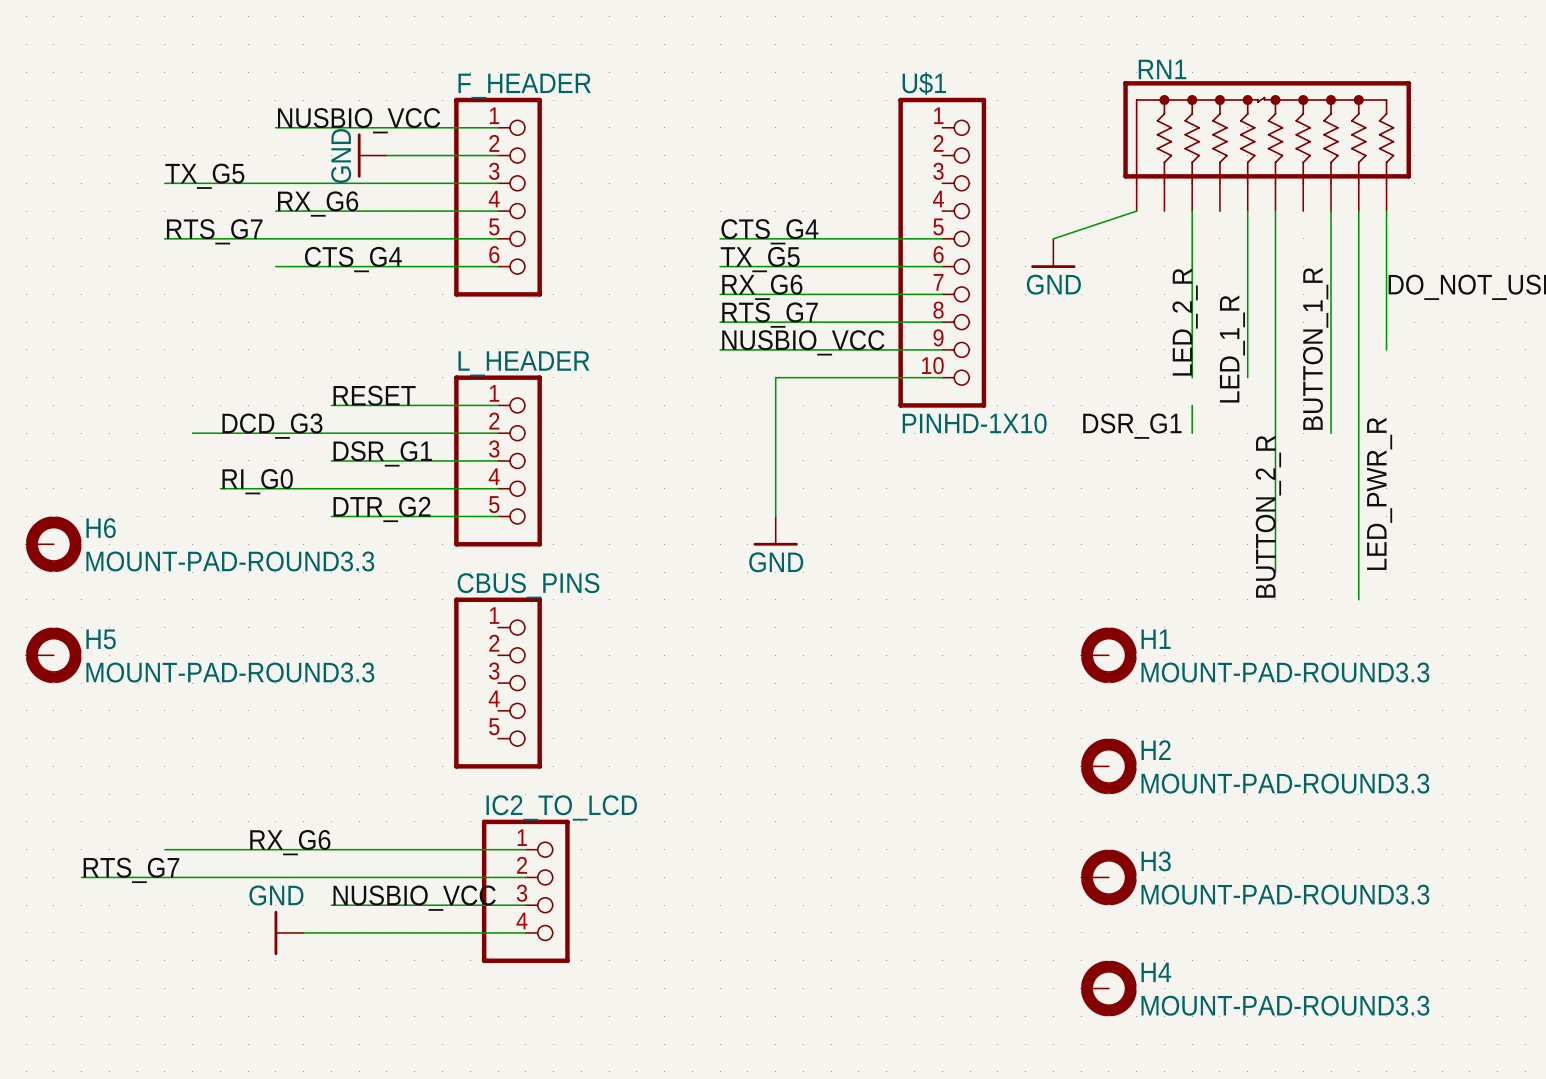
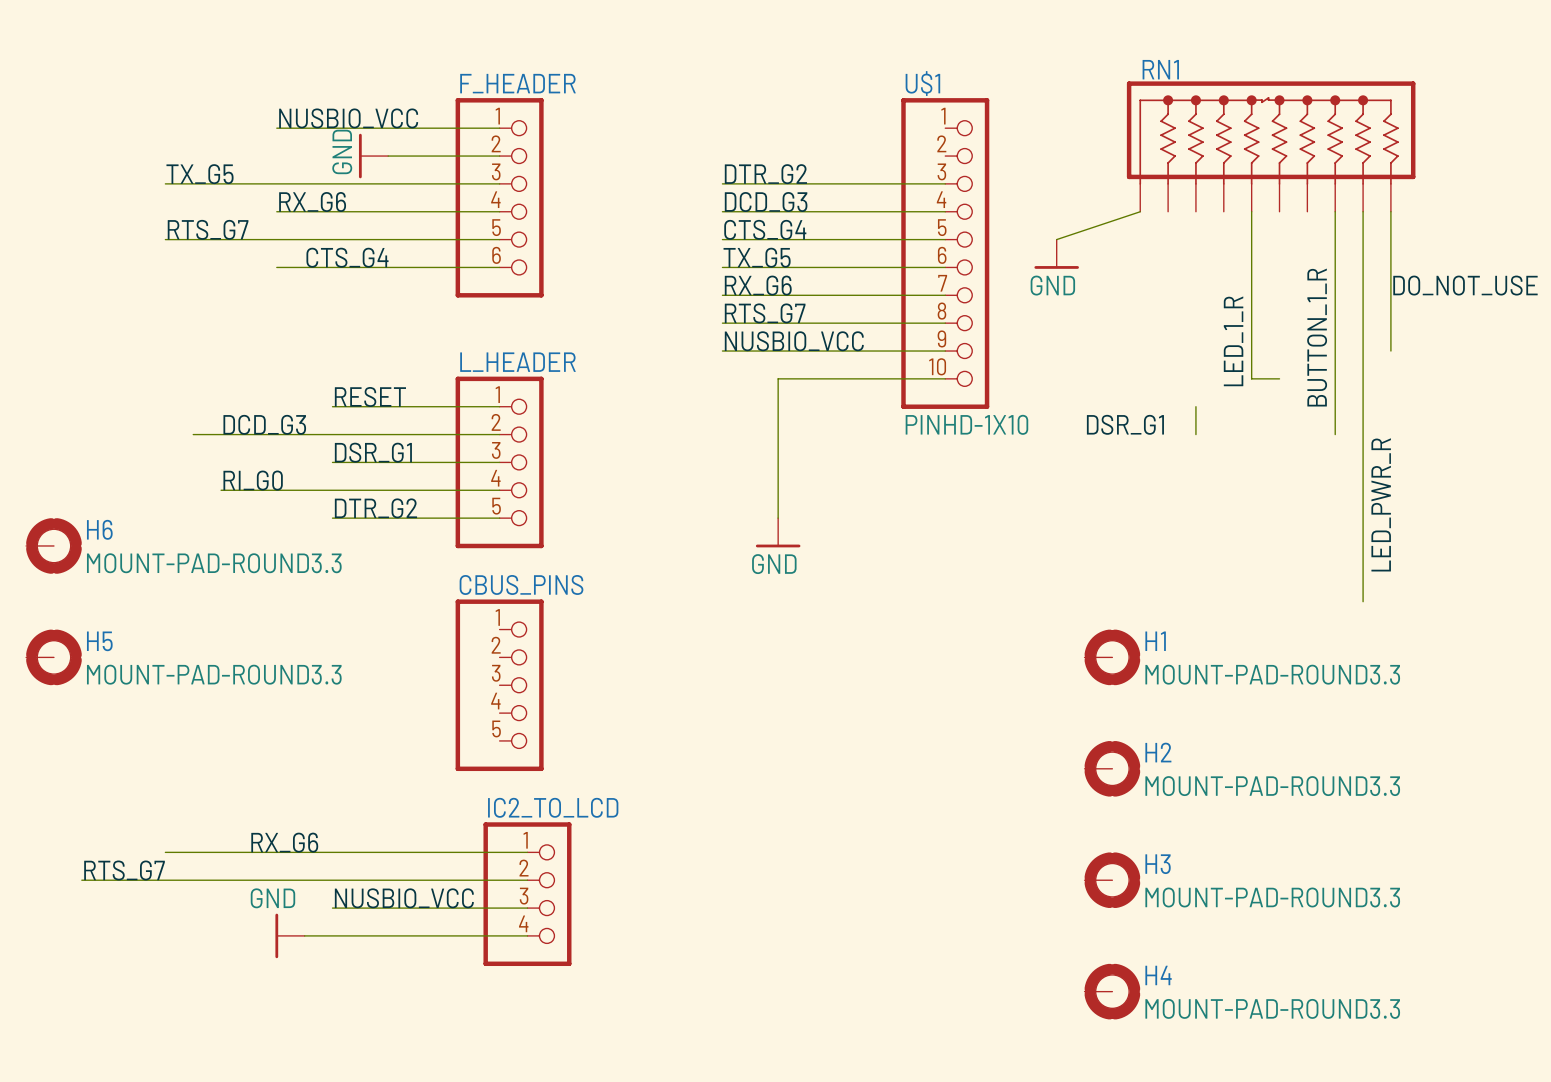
label: none -> DTR_G2 (765, 174)
wire: none -> (722, 183) (945, 183)
label: none -> DCD_G3 (766, 202)
wire: none -> (722, 211) (945, 211)
wire: (1192, 211) (1192, 377) -> none
wire: (1275, 211) (1275, 572) -> none
label: LED_2_R (1185, 322) -> none
wire: none -> (1251, 378) (1279, 378)
label: BUTTON_2_R (1268, 516) -> none

